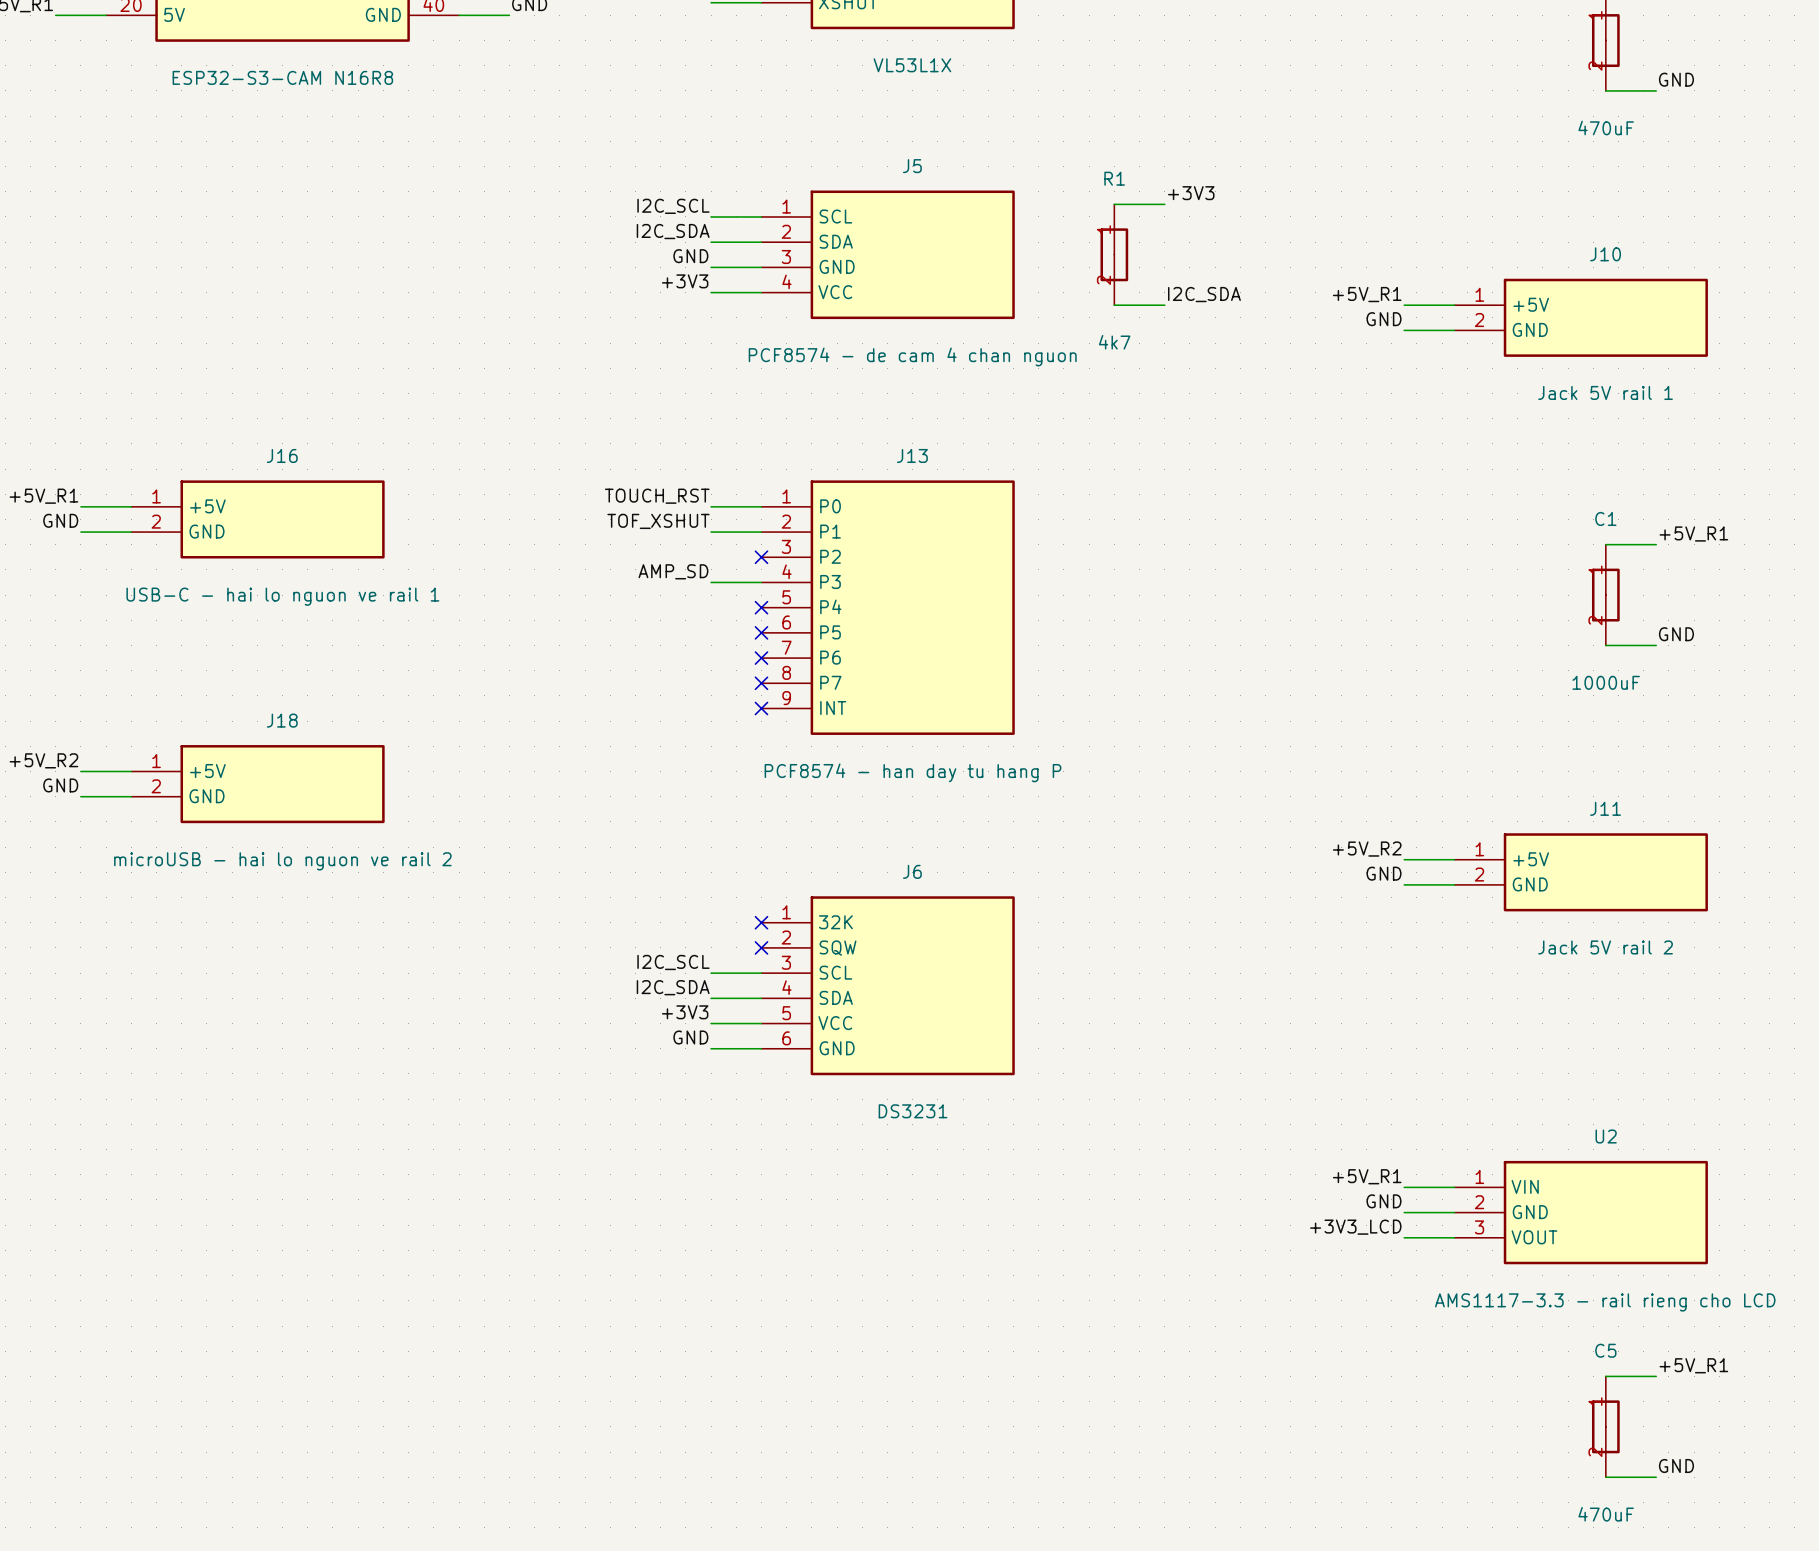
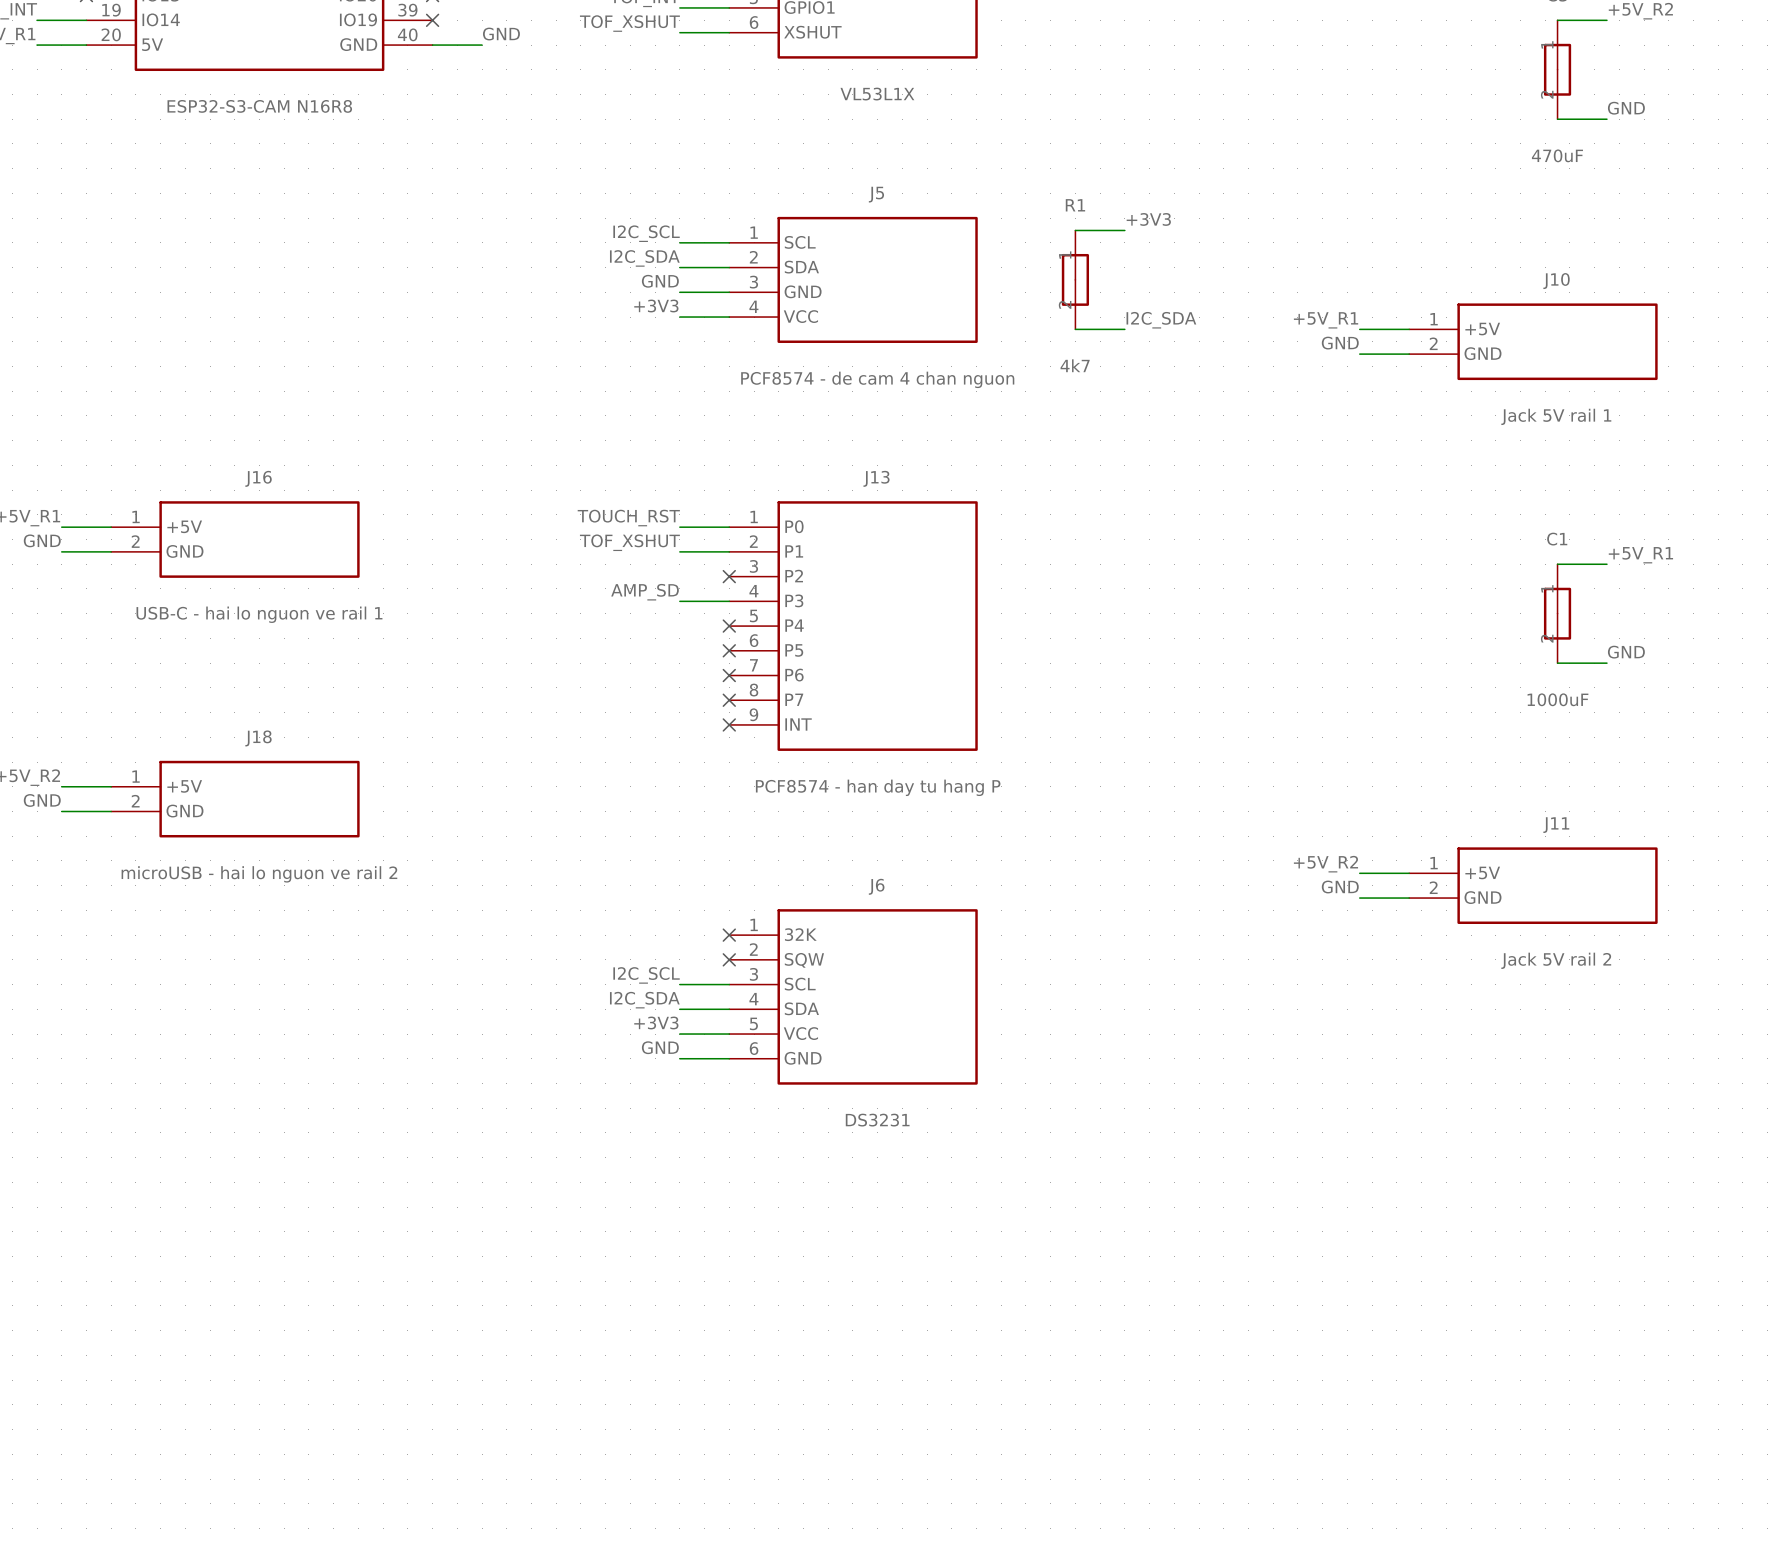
label: +5V_R1 (1367, 1176) -> none
wire: (1404, 1187) (1454, 1187) -> none
label: GND (1384, 1201) -> none
wire: (1404, 1212) (1454, 1212) -> none
U2: AMS1117-3.3 - rail rieng cho LCD (1581, 1212) -> none
label: +3V3_LCD (1355, 1227) -> none
wire: (1404, 1237) (1454, 1237) -> none
label: +5V_R1 (1693, 1365) -> none
wire: (1605, 1376) (1656, 1376) -> none
C5: 470uF (1605, 1426) -> none
label: GND (1676, 1466) -> none
wire: (1605, 1477) (1656, 1477) -> none

